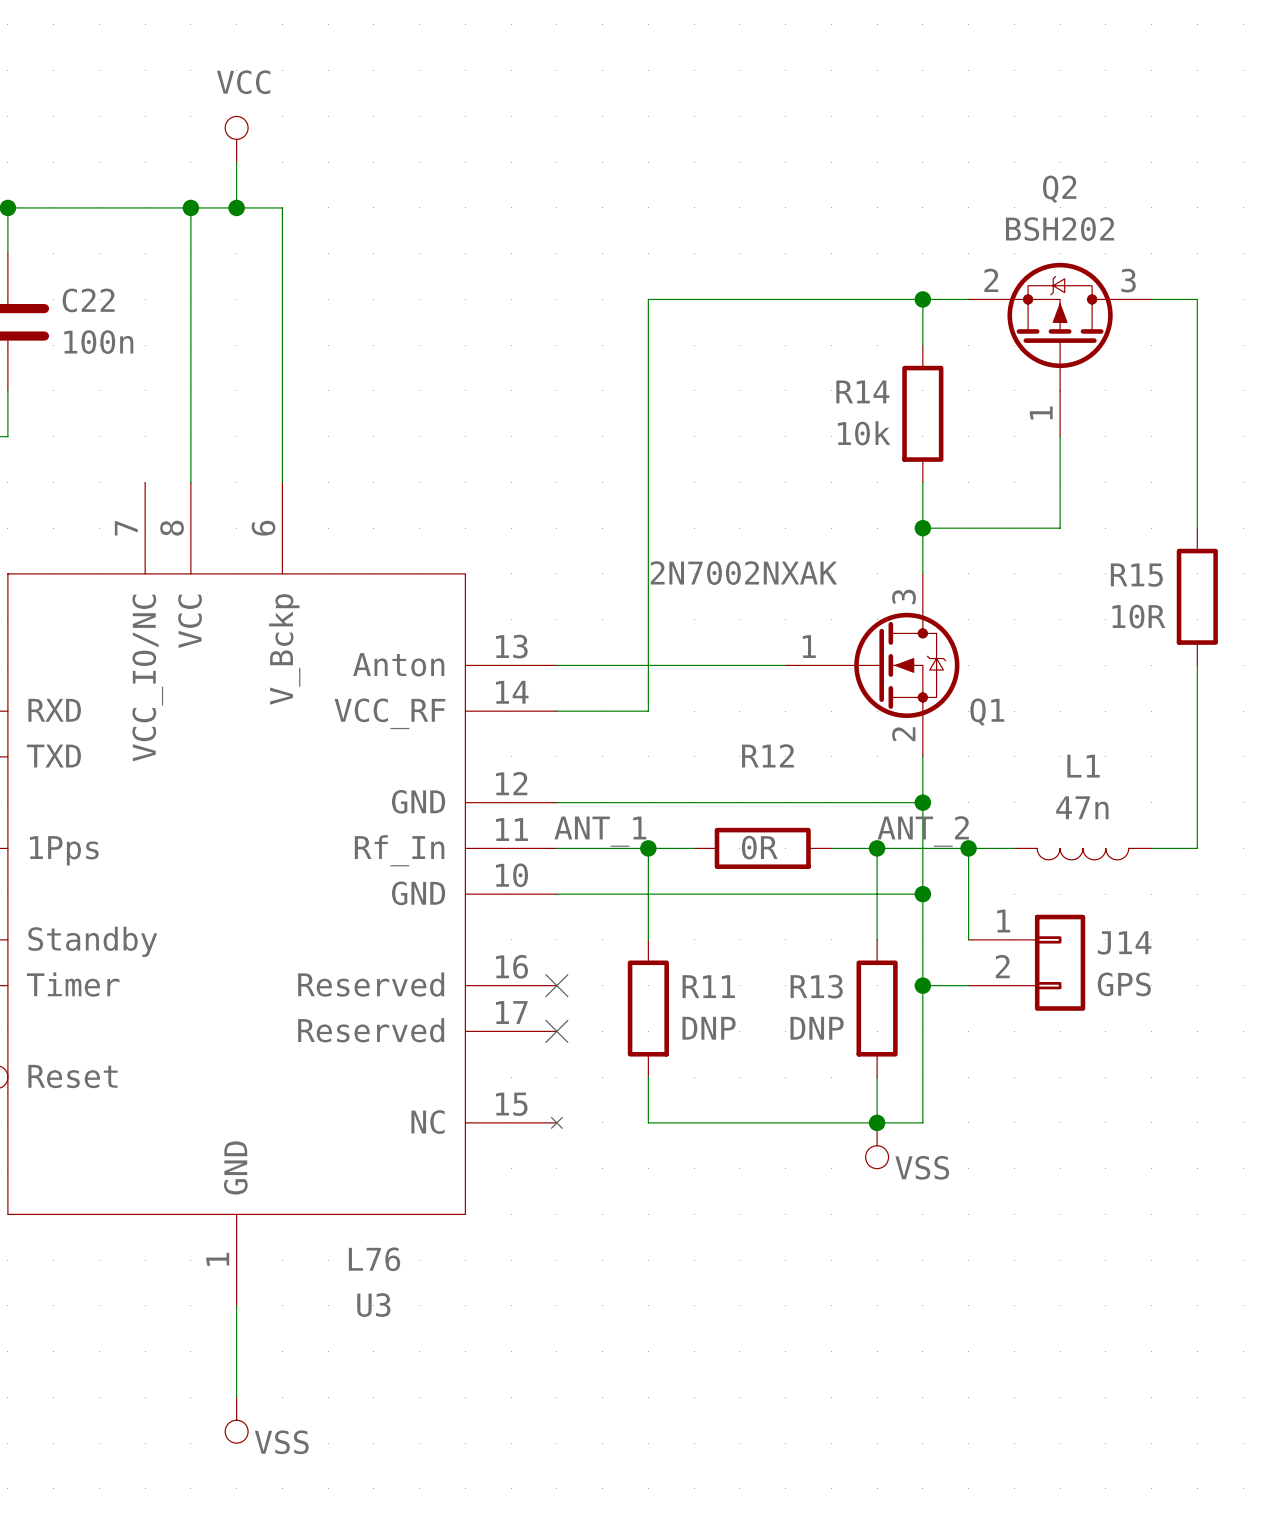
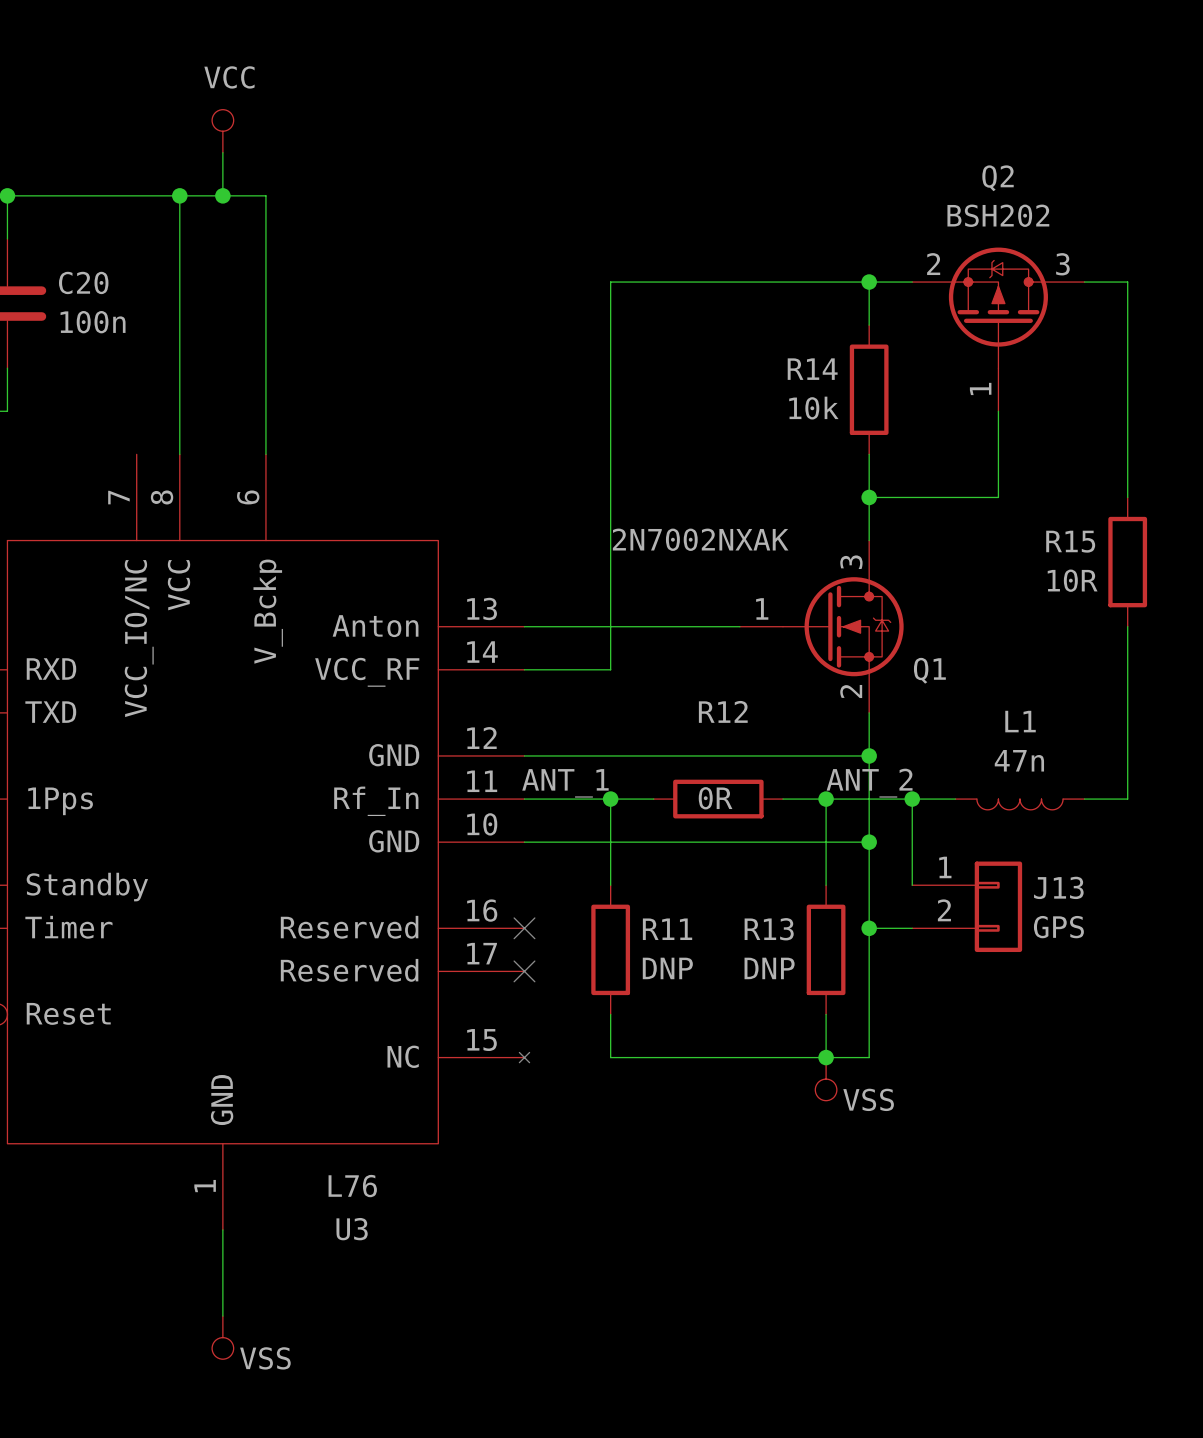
C22 name: C22 (88, 300) -> C20 (83, 282)
J14 name: J14 (1124, 942) -> J13 (1058, 887)

